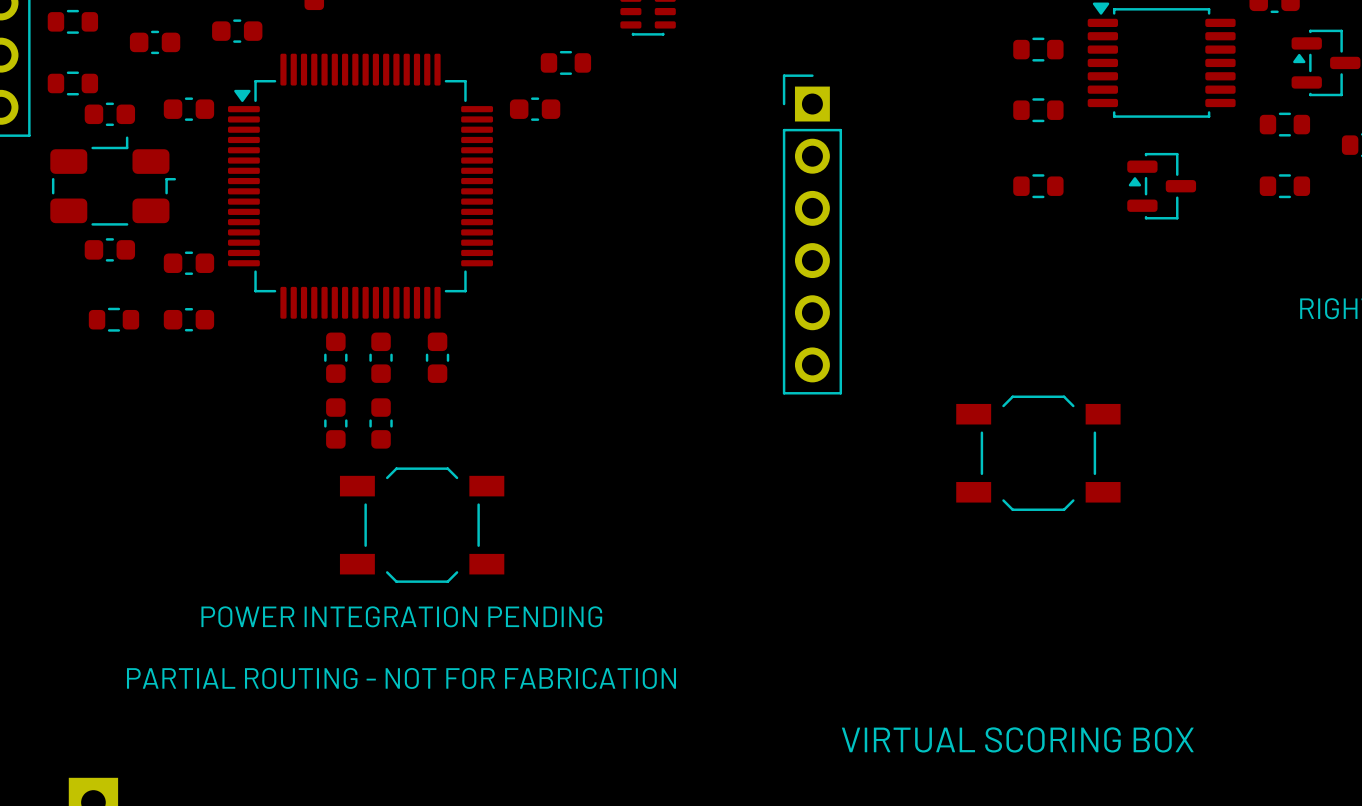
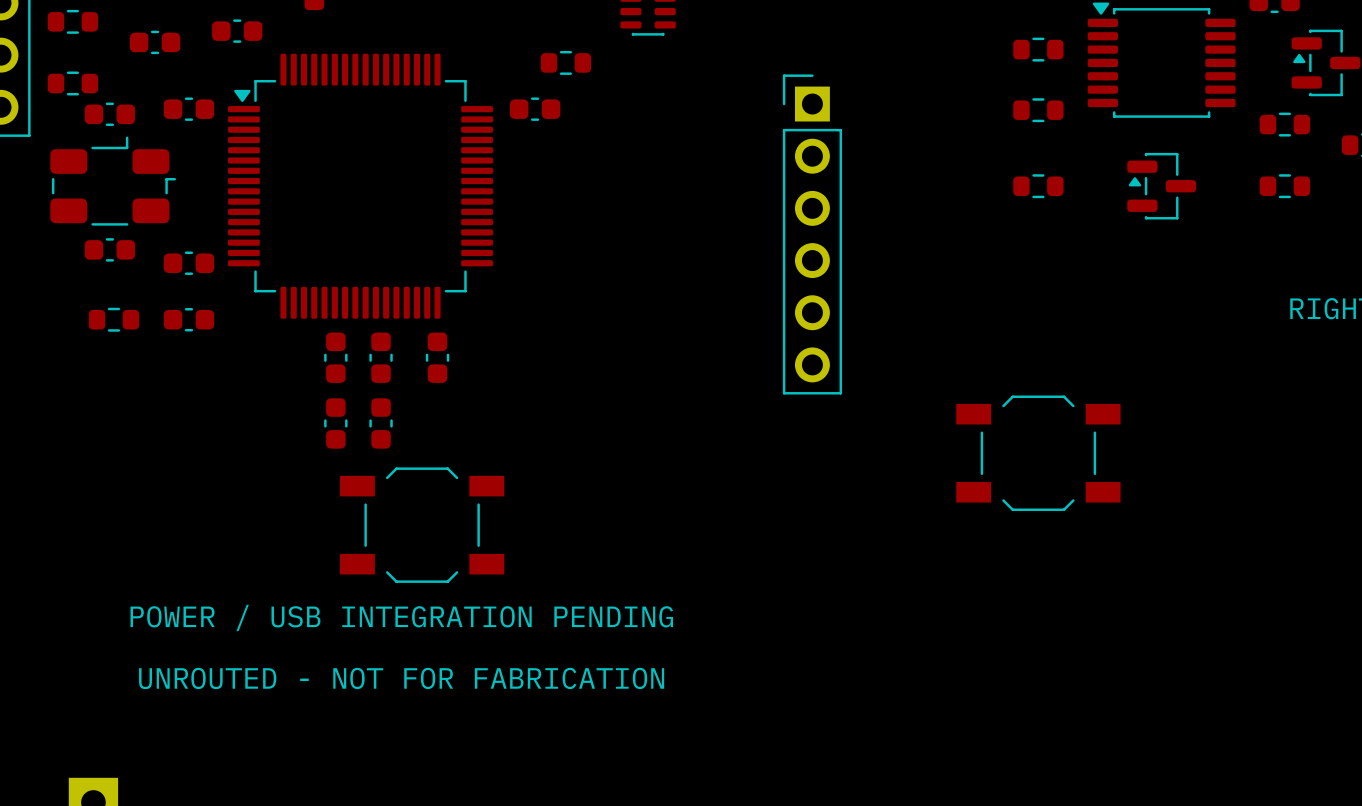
text: POWER INTEGRATION PENDING (401, 616) -> POWER / USB INTEGRATION PENDING (401, 617)
text: PARTIAL ROUTING - NOT FOR FABRICATION (401, 678) -> UNROUTED - NOT FOR FABRICATION (401, 678)
text: VIRTUAL SCORING BOX (1017, 739) -> none

